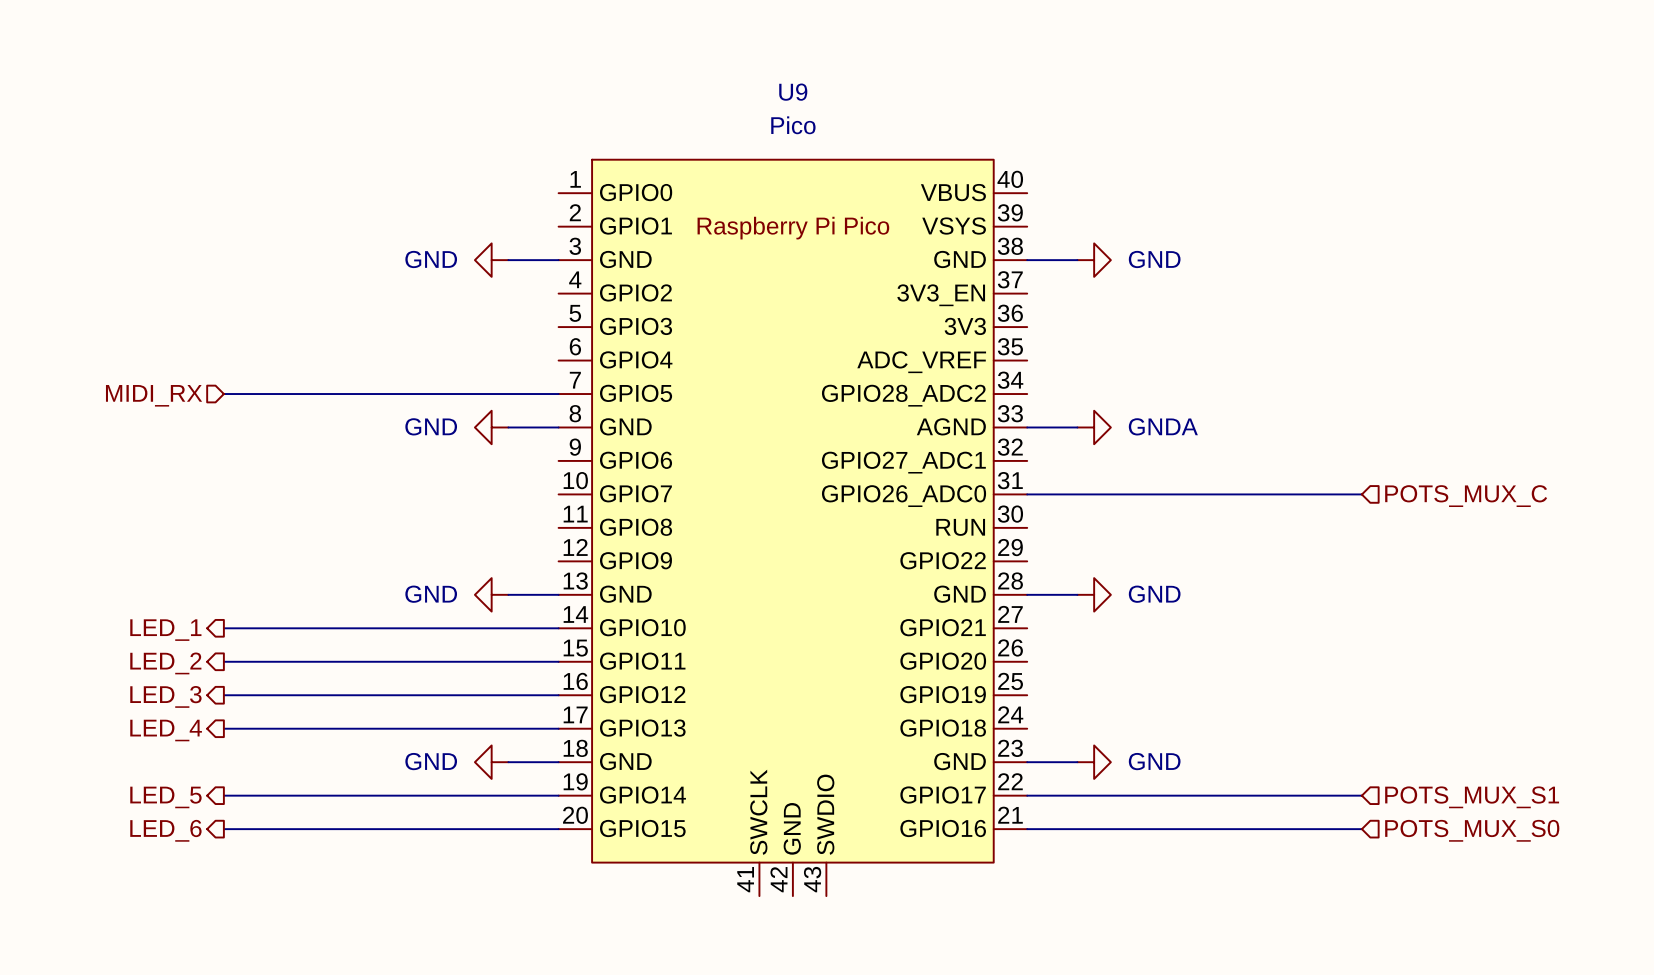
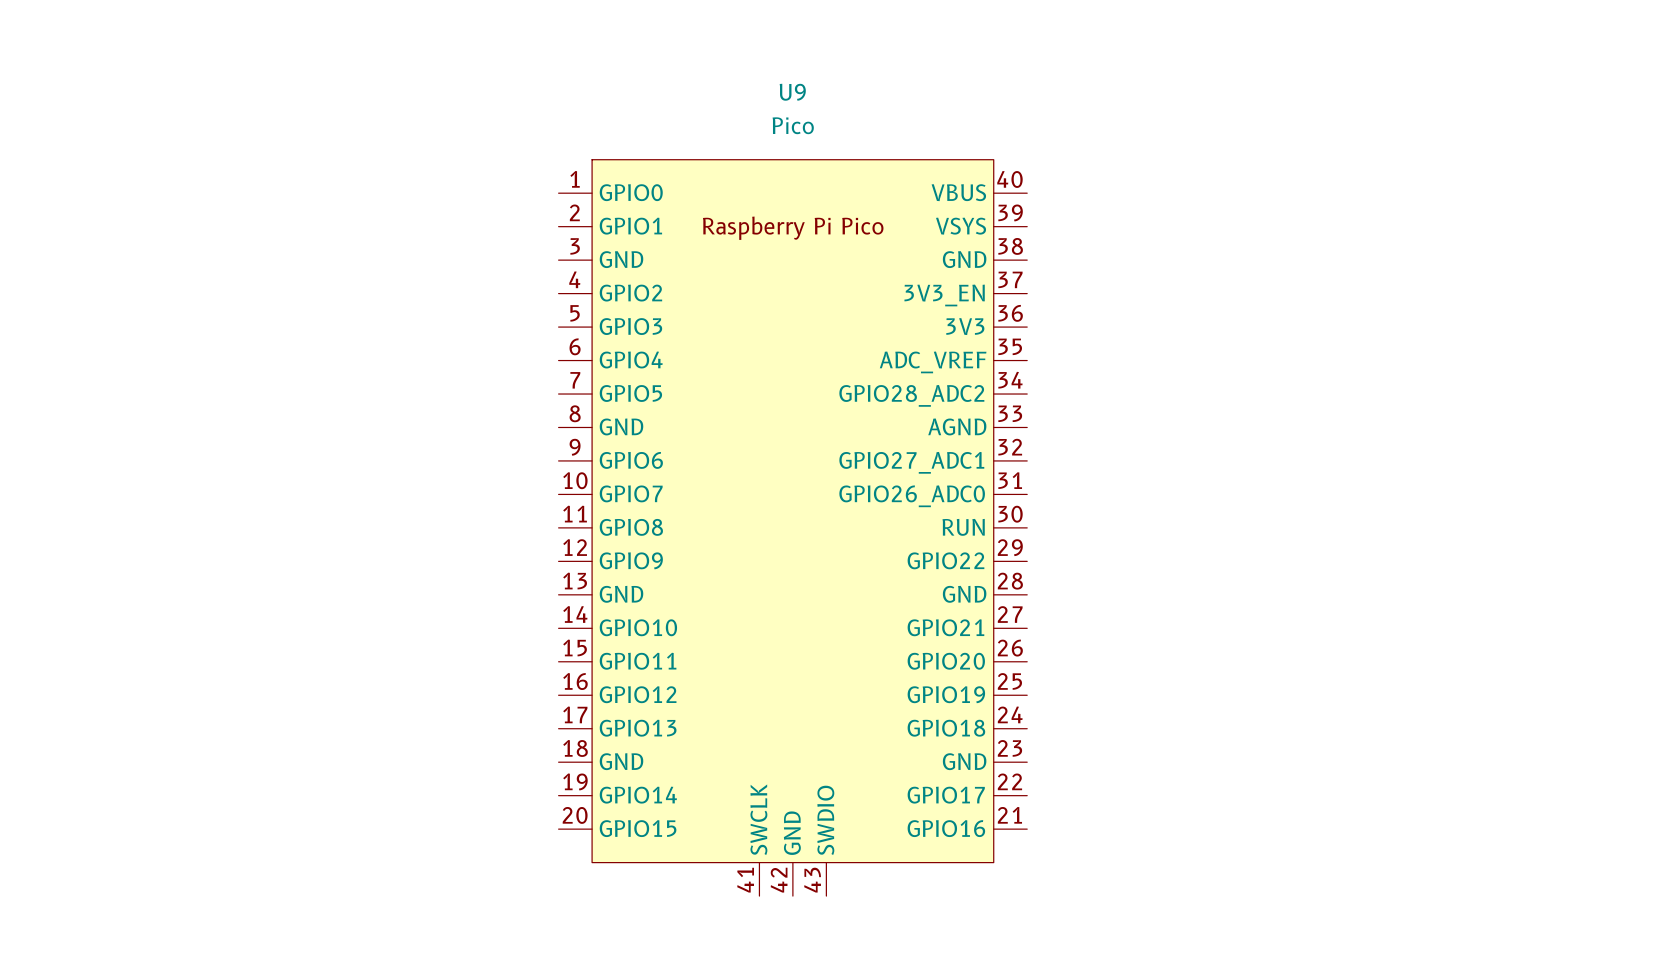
power symbol: GND (491, 260) -> none
wire: (508, 260) (558, 260) -> none
wire: (1027, 260) (1077, 260) -> none
power symbol: GND (1094, 260) -> none
wire: (223, 394) (558, 394) -> none
hierarchical label: MIDI_RX (154, 395) -> none
power symbol: GND (491, 427) -> none
wire: (508, 427) (558, 427) -> none
wire: (1027, 427) (1077, 427) -> none
power symbol: GNDA (1094, 427) -> none
wire: (1027, 494) (1361, 494) -> none
hierarchical label: POTS_MUX_C (1466, 496) -> none
power symbol: GND (491, 594) -> none
wire: (508, 594) (558, 594) -> none
wire: (1027, 594) (1077, 594) -> none
power symbol: GND (1094, 594) -> none
wire: (223, 628) (558, 628) -> none
hierarchical label: LED_1 (165, 630) -> none
wire: (223, 661) (558, 661) -> none
hierarchical label: LED_2 (165, 663) -> none
wire: (223, 695) (558, 695) -> none
hierarchical label: LED_3 (165, 696) -> none
wire: (223, 728) (558, 728) -> none
hierarchical label: LED_4 (166, 730) -> none
power symbol: GND (491, 762) -> none
wire: (508, 762) (558, 762) -> none
wire: (1027, 762) (1077, 762) -> none
power symbol: GND (1094, 762) -> none
wire: (223, 795) (558, 795) -> none
wire: (1027, 795) (1361, 795) -> none
hierarchical label: LED_5 (165, 797) -> none
hierarchical label: POTS_MUX_S1 (1472, 797) -> none
wire: (223, 829) (558, 829) -> none
wire: (1027, 829) (1361, 829) -> none
hierarchical label: LED_6 (165, 830) -> none
hierarchical label: POTS_MUX_S0 (1472, 830) -> none

